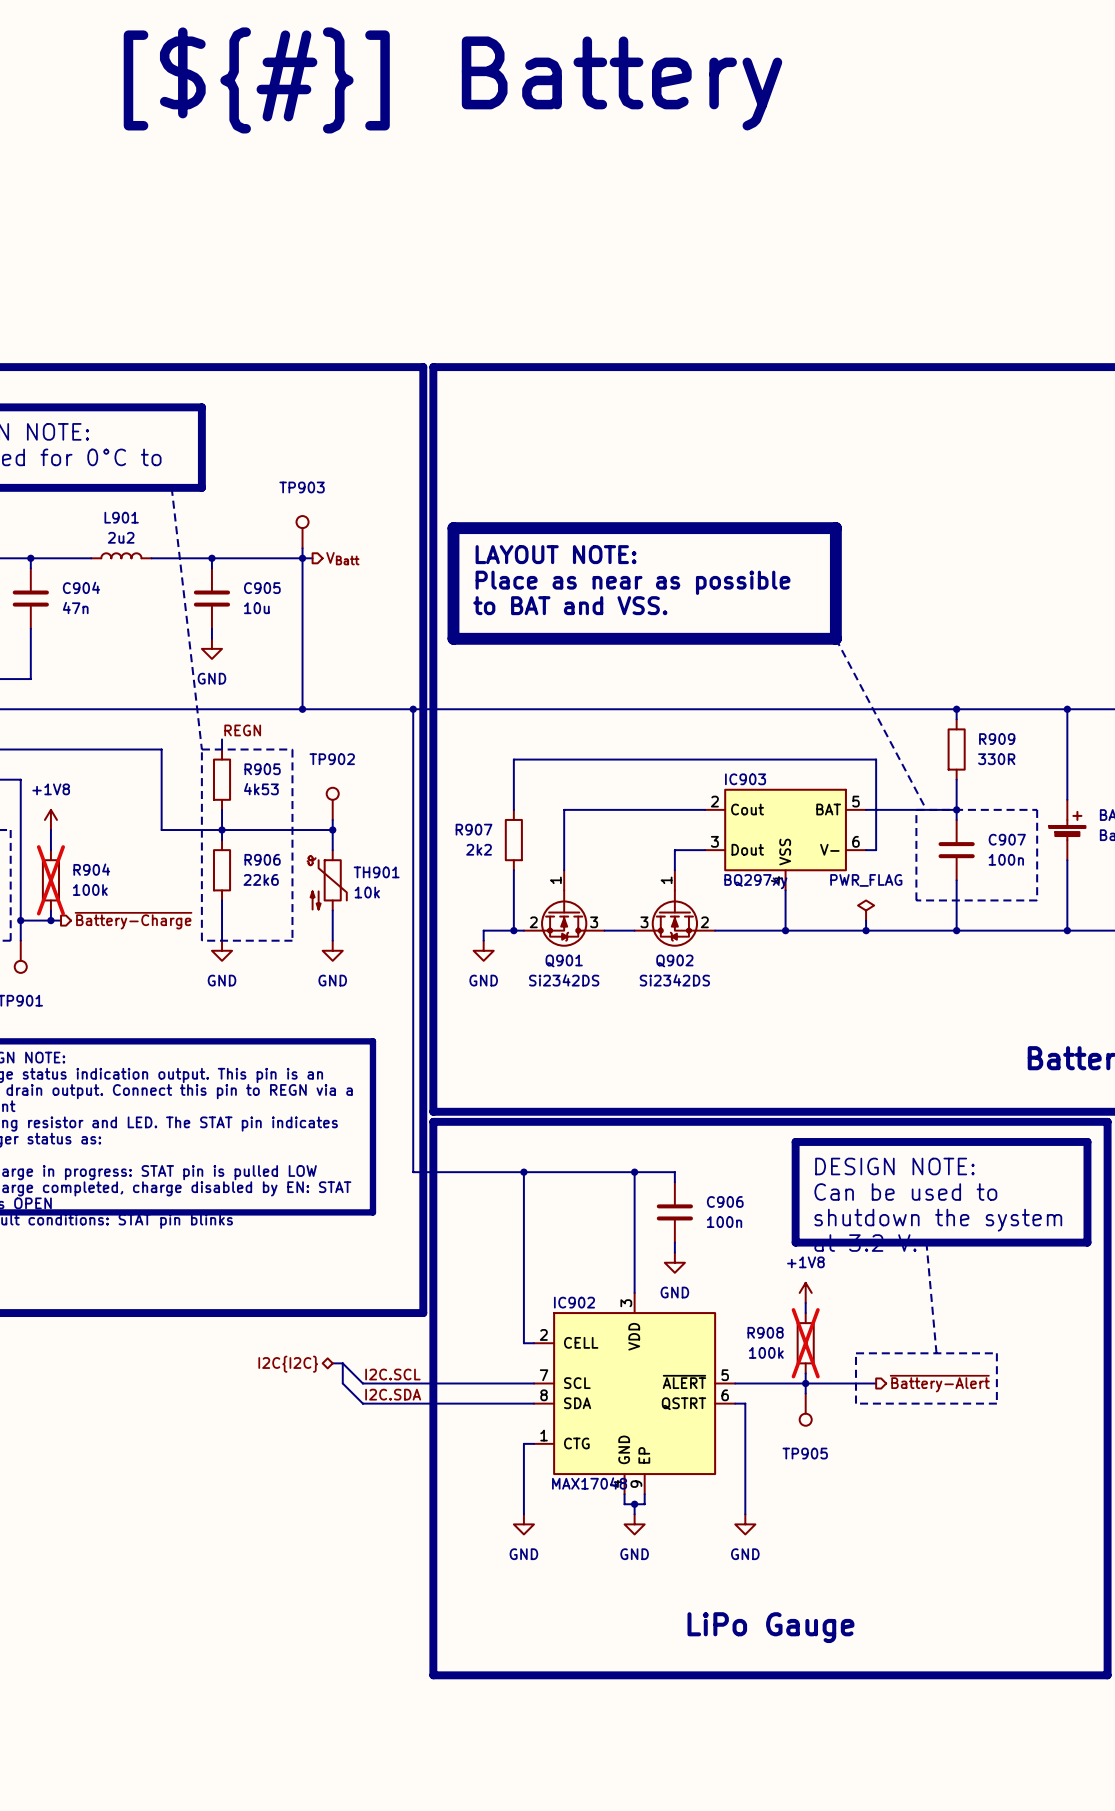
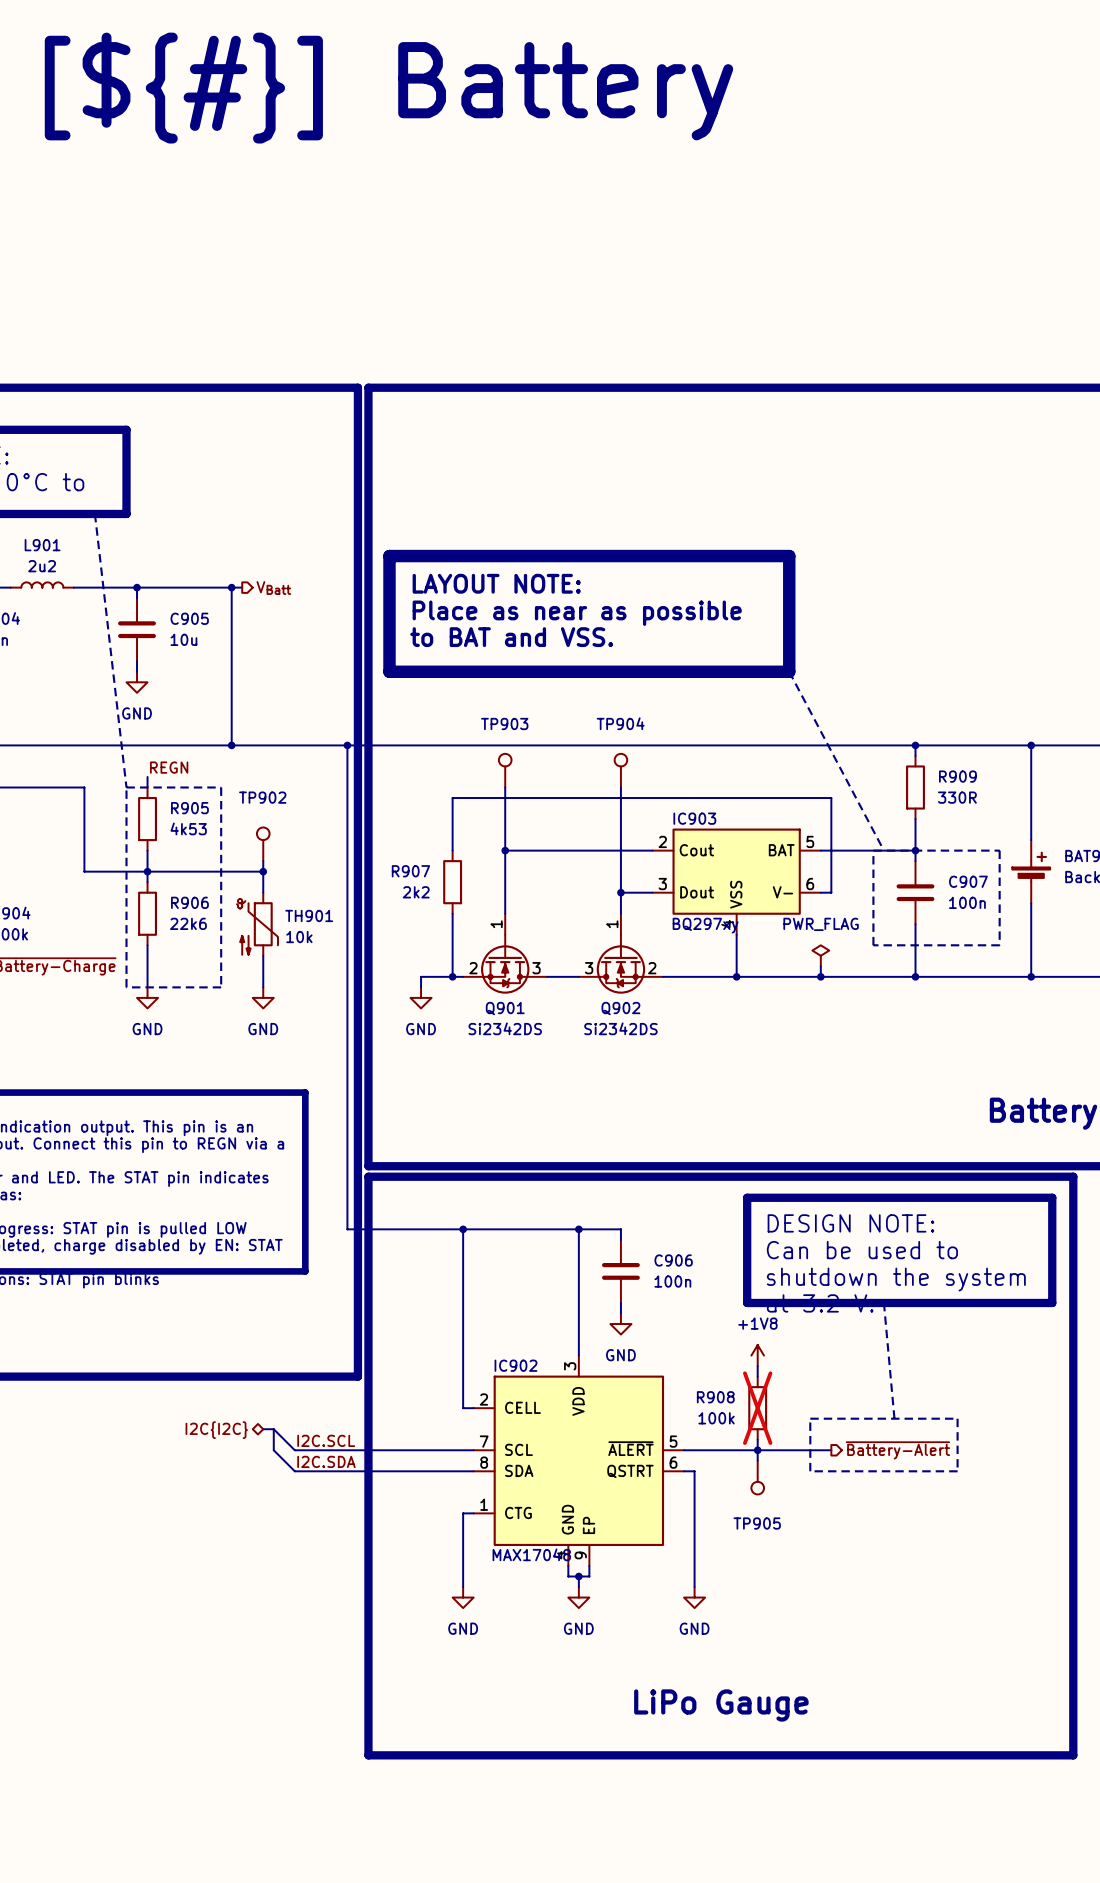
TP903 position: (302, 532) -> (505, 770)
wire: (302, 548) (302, 558) -> none
TP904: none -> (620, 770)
wire: none -> (505, 787) (505, 850)
wire: none -> (620, 787) (620, 892)
junction: none -> (505, 850)
junction: none -> (620, 892)

